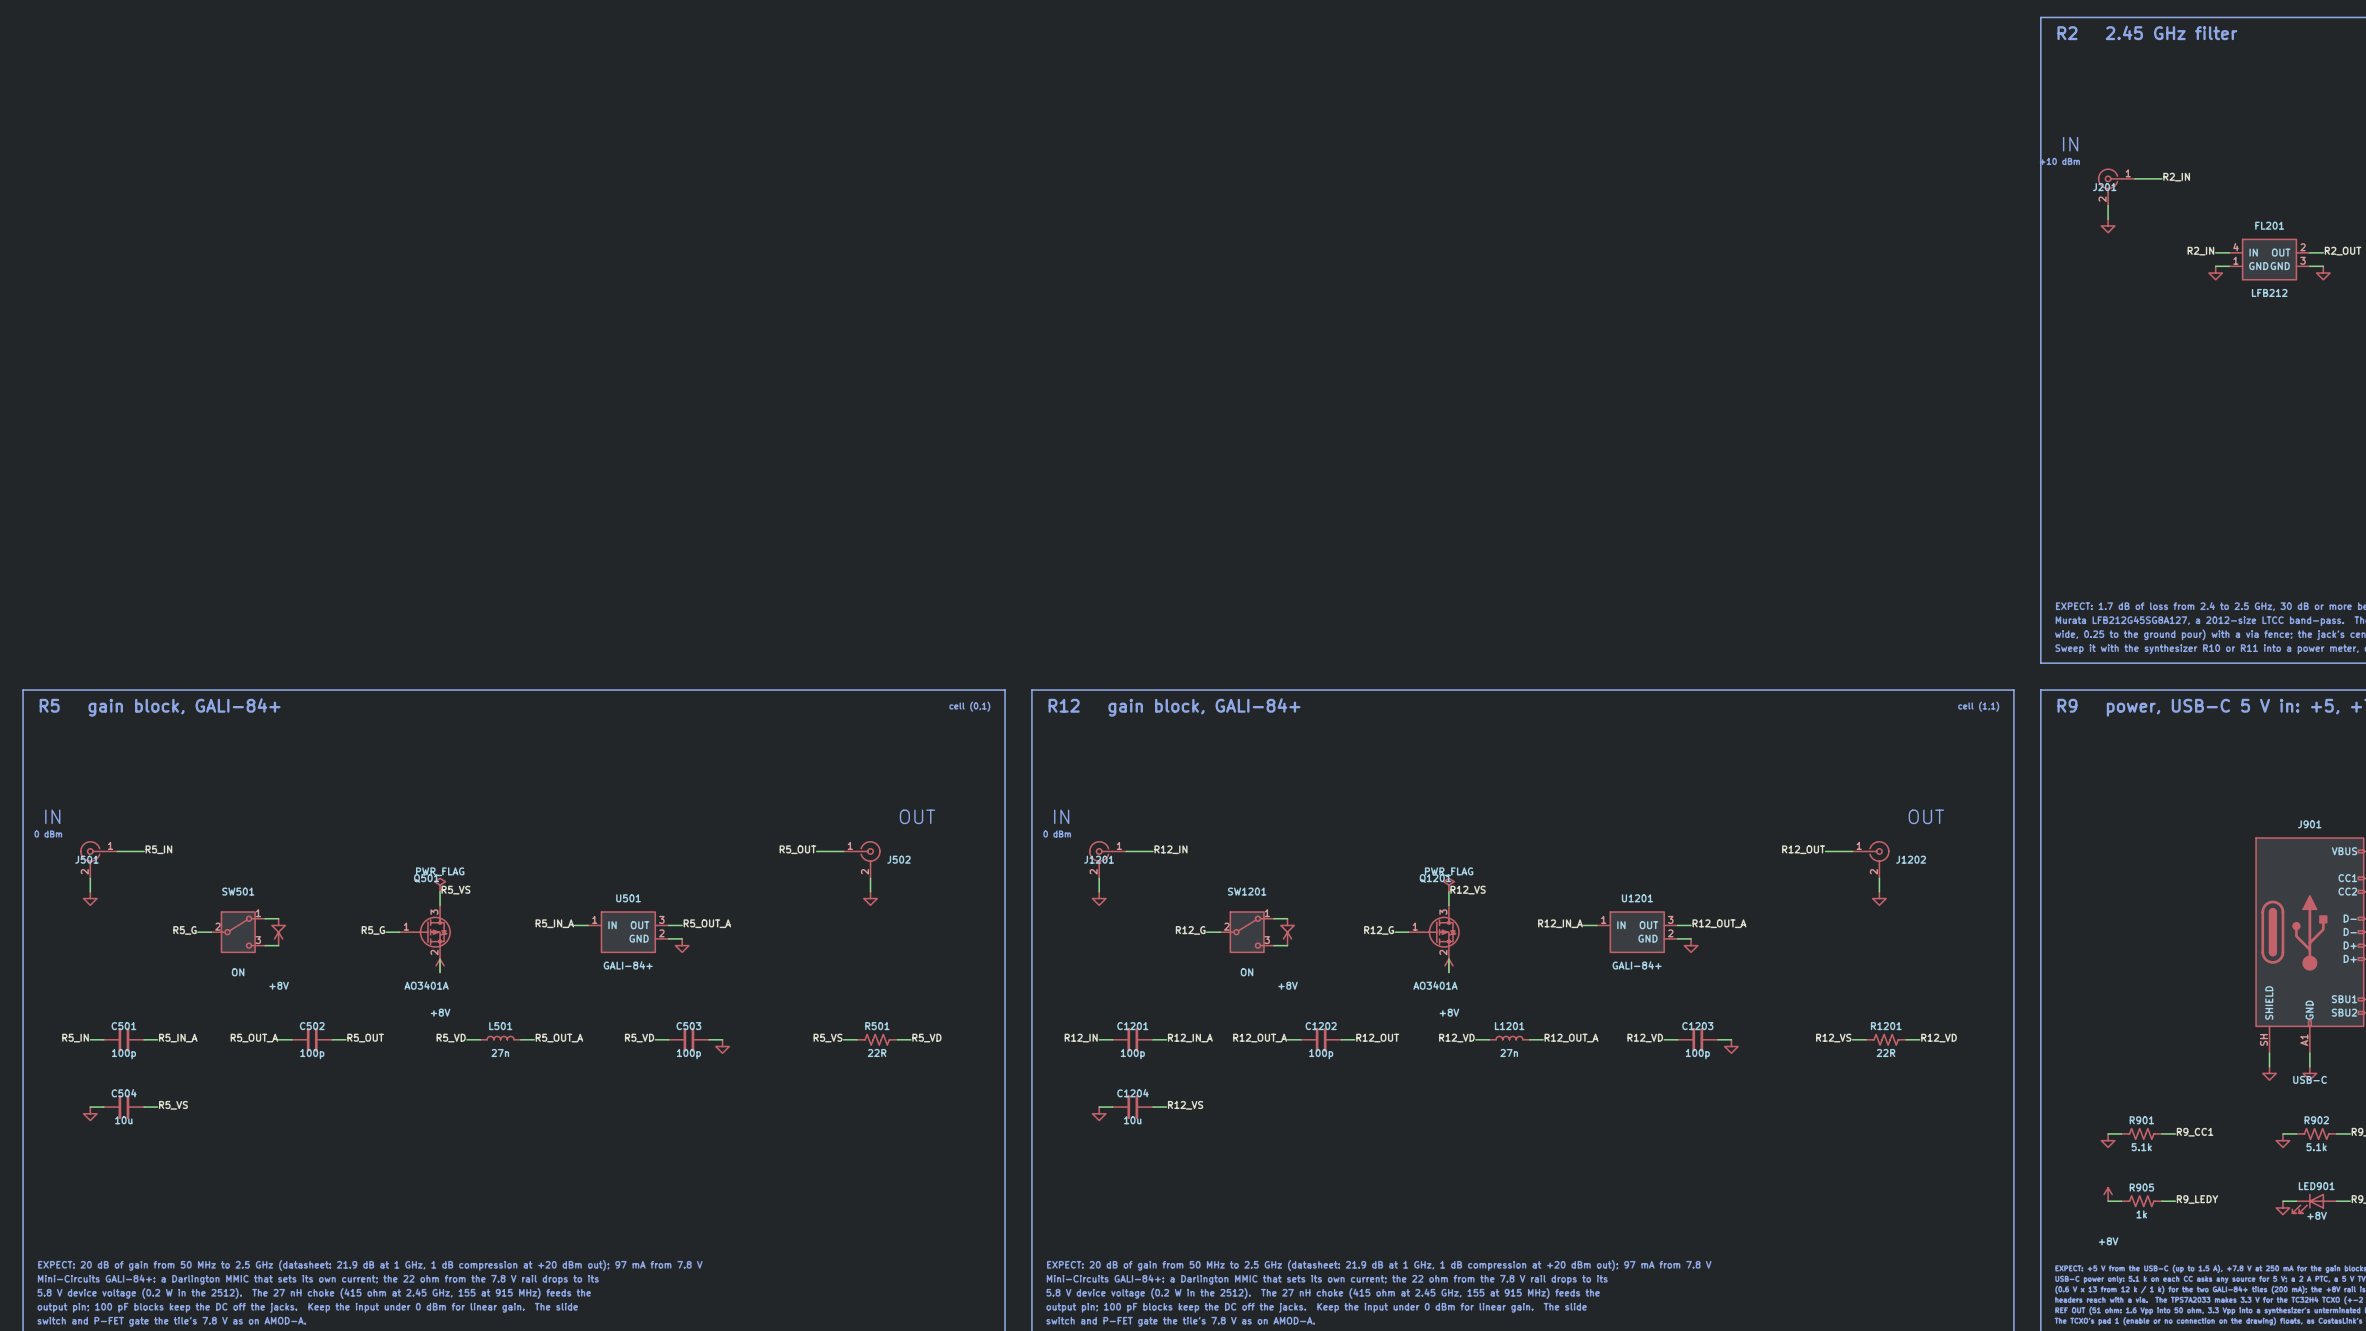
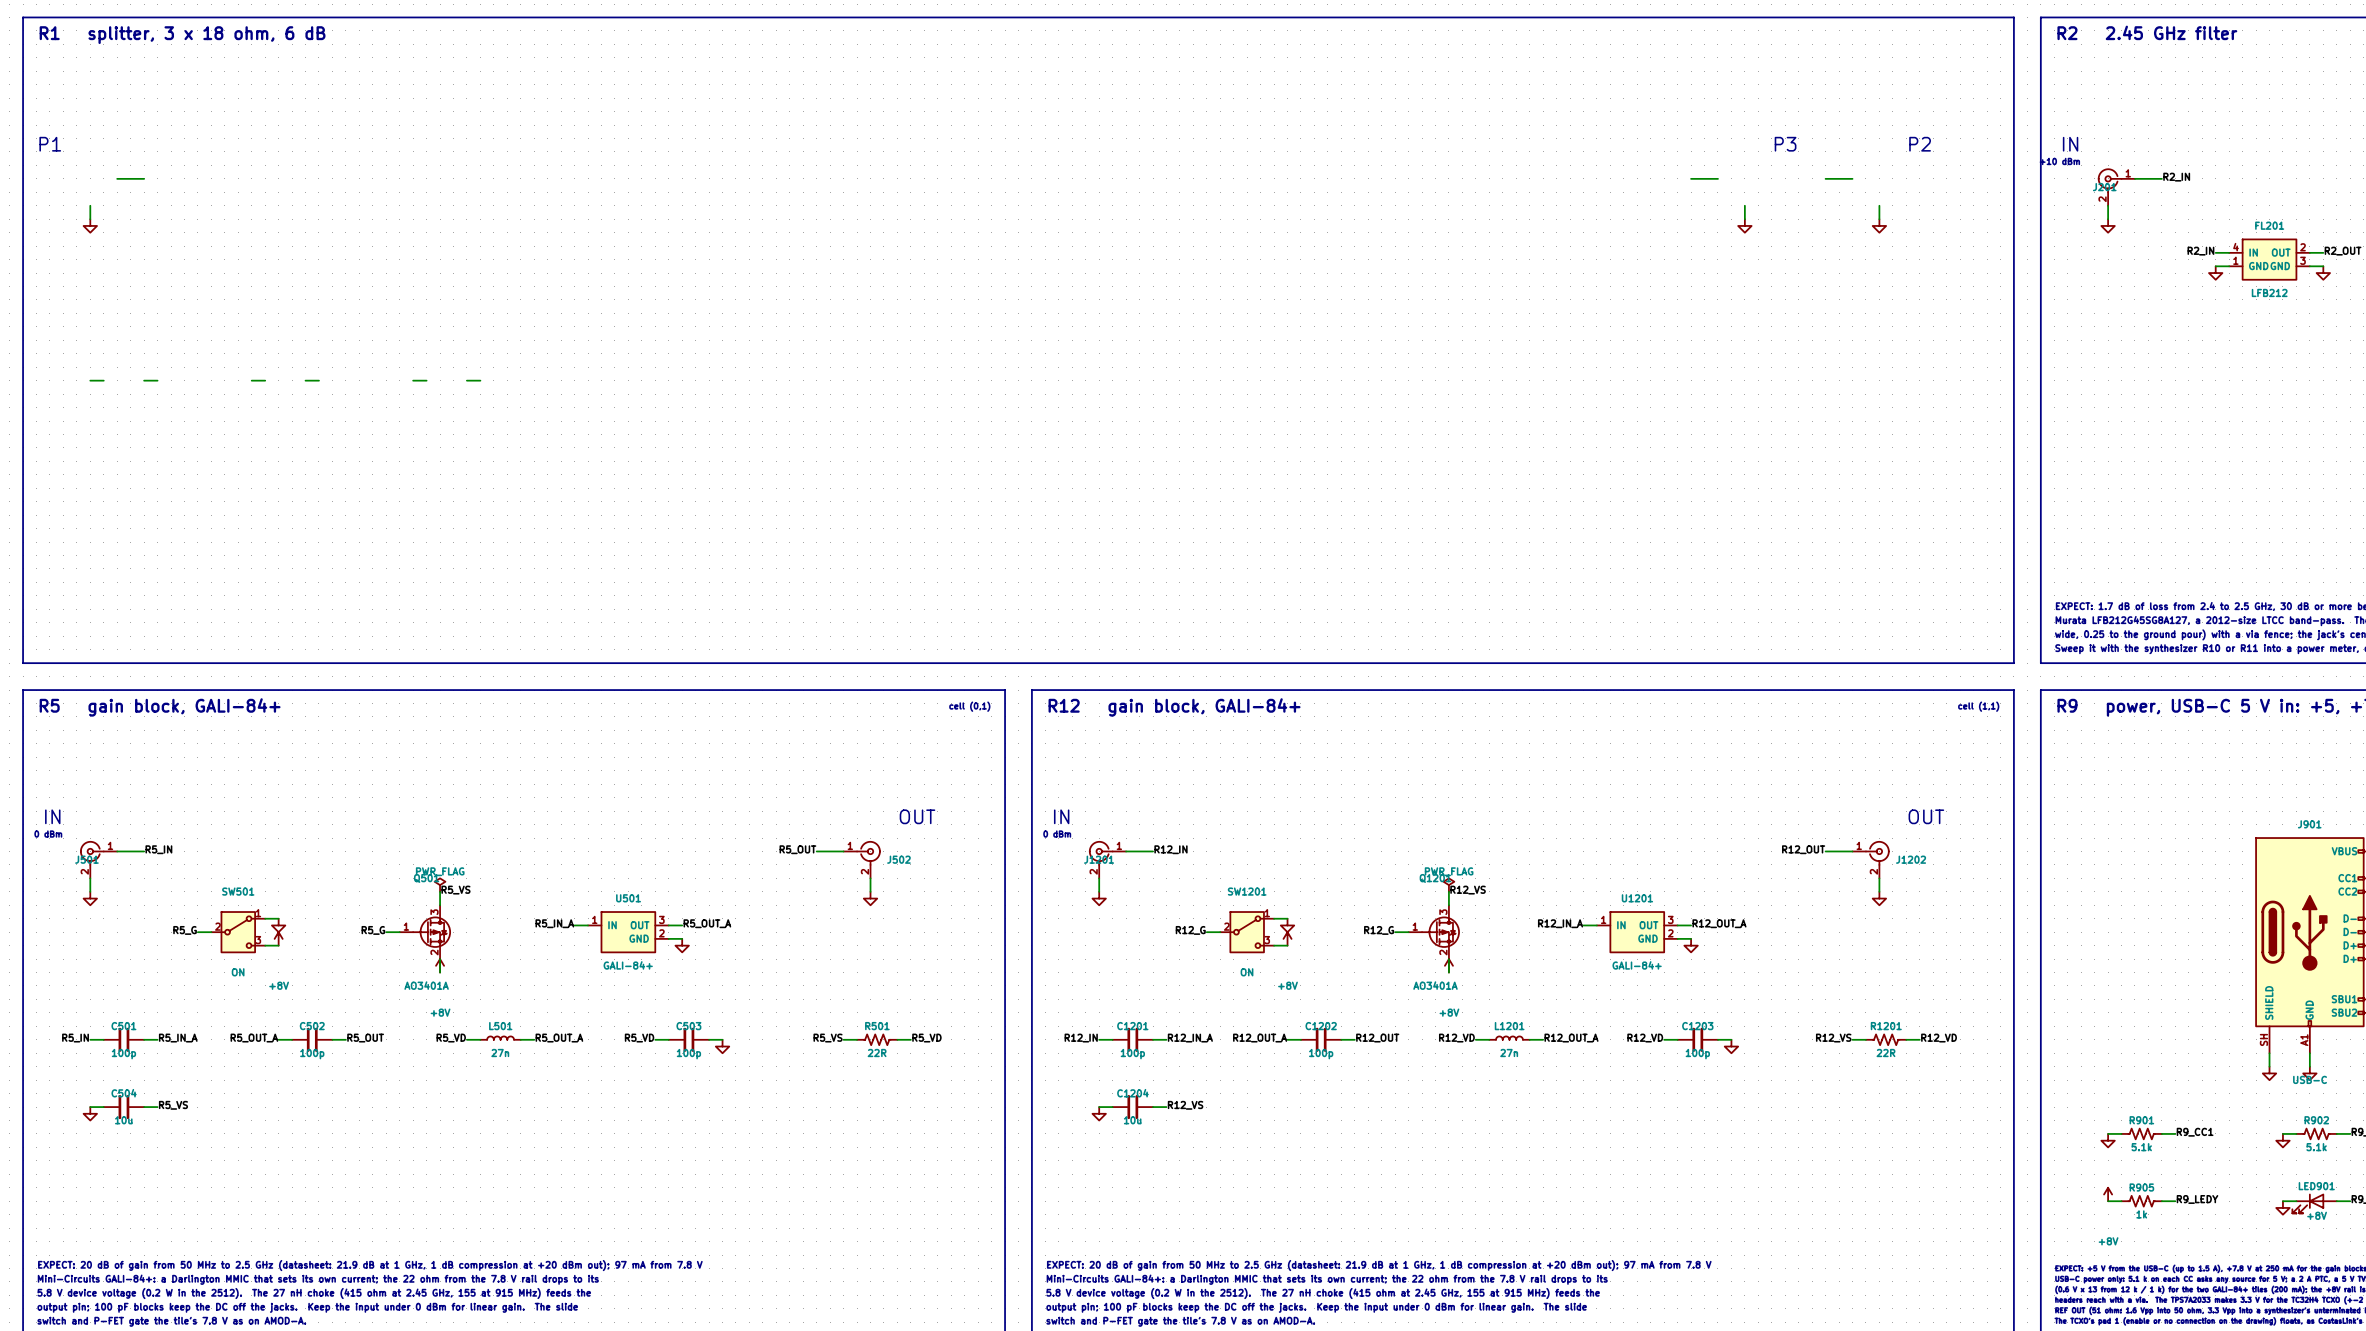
line: none -> (23, 17) (2013, 17) (2013, 663) (23, 663) (23, 17)
text: none -> R1 splitter, 3 x 18 ohm, 6 dB (182, 35)
text: none -> P1 (50, 144)
text: none -> P3 (1785, 144)
text: none -> P2 (1920, 144)
wire: none -> (117, 178) (144, 178)
wire: none -> (1691, 178) (1717, 178)
wire: none -> (1825, 178) (1852, 178)
wire: none -> (90, 205) (90, 219)
wire: none -> (1744, 205) (1744, 219)
wire: none -> (1879, 205) (1879, 219)
power symbol: none -> (90, 225)
power symbol: none -> (1744, 225)
power symbol: none -> (1879, 225)
wire: none -> (90, 380) (103, 380)
wire: none -> (144, 380) (157, 380)
wire: none -> (251, 380) (265, 380)
wire: none -> (305, 380) (318, 380)
wire: none -> (413, 380) (426, 380)
wire: none -> (466, 380) (480, 380)

